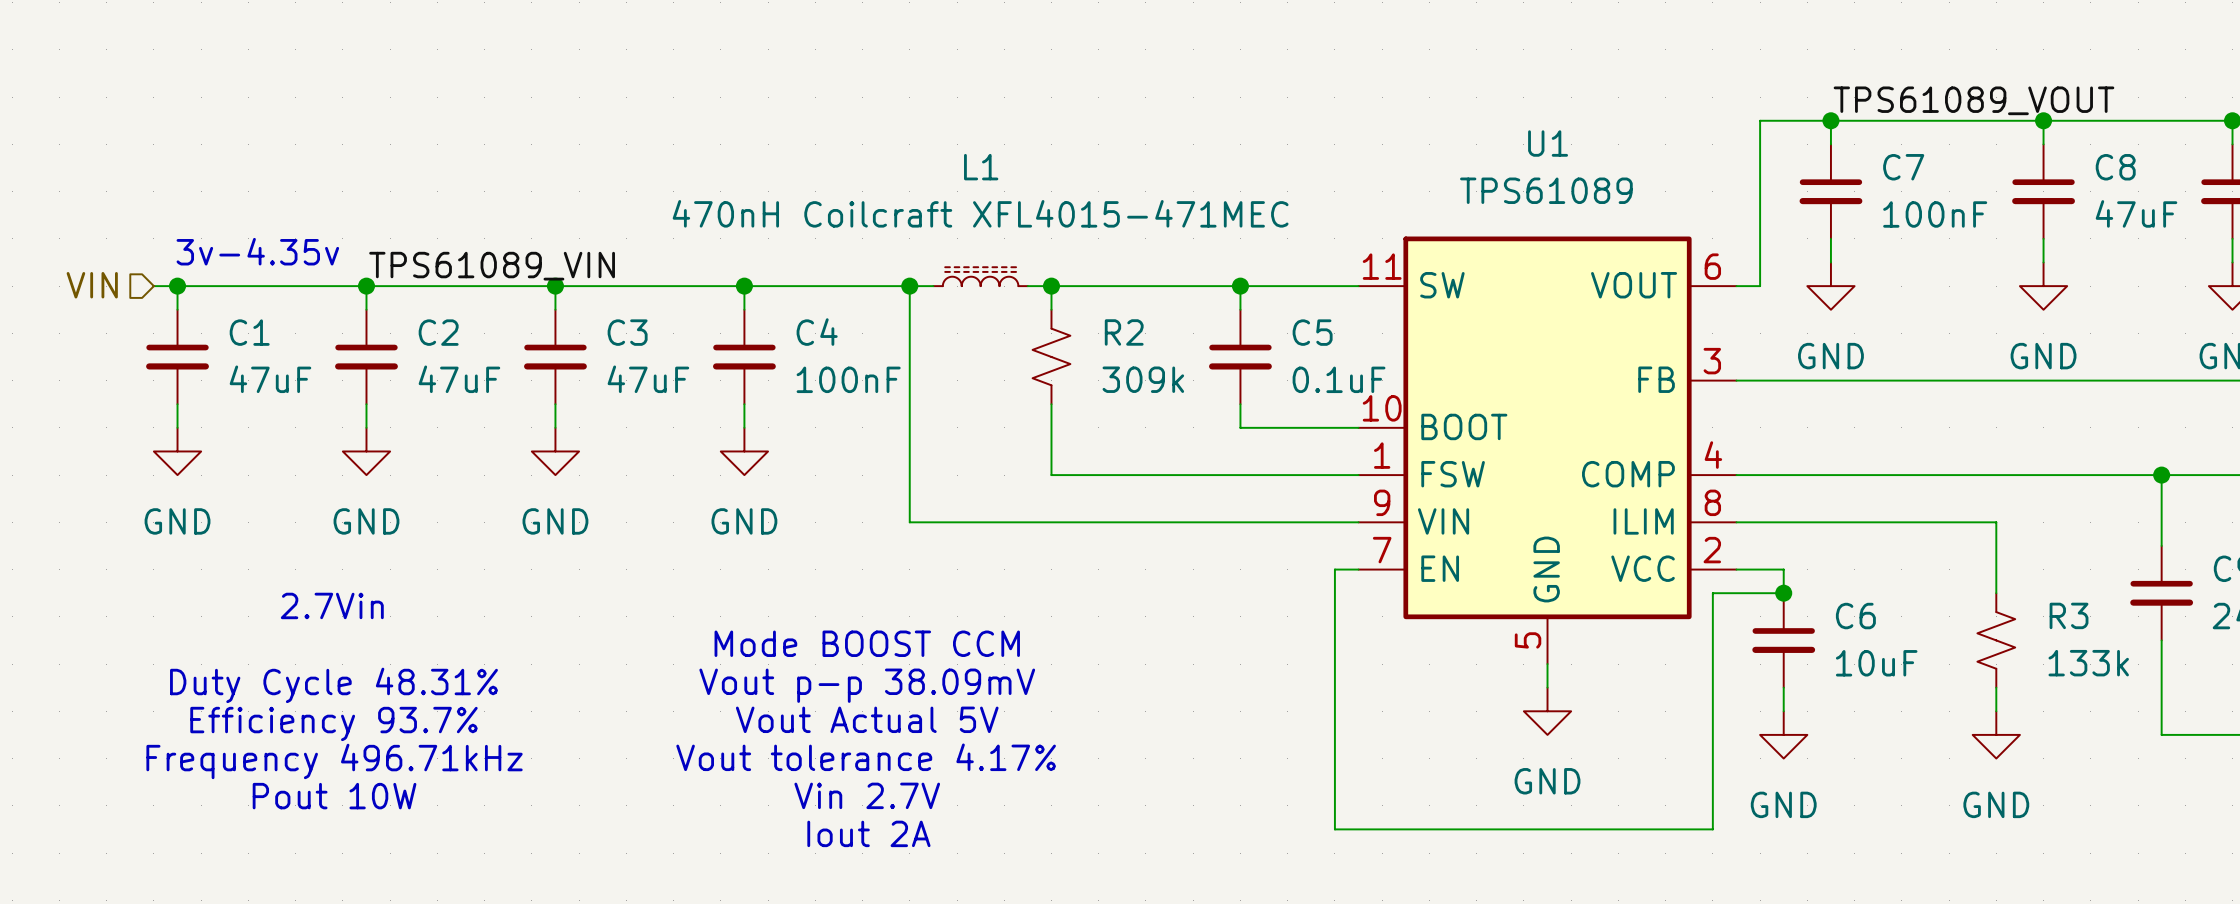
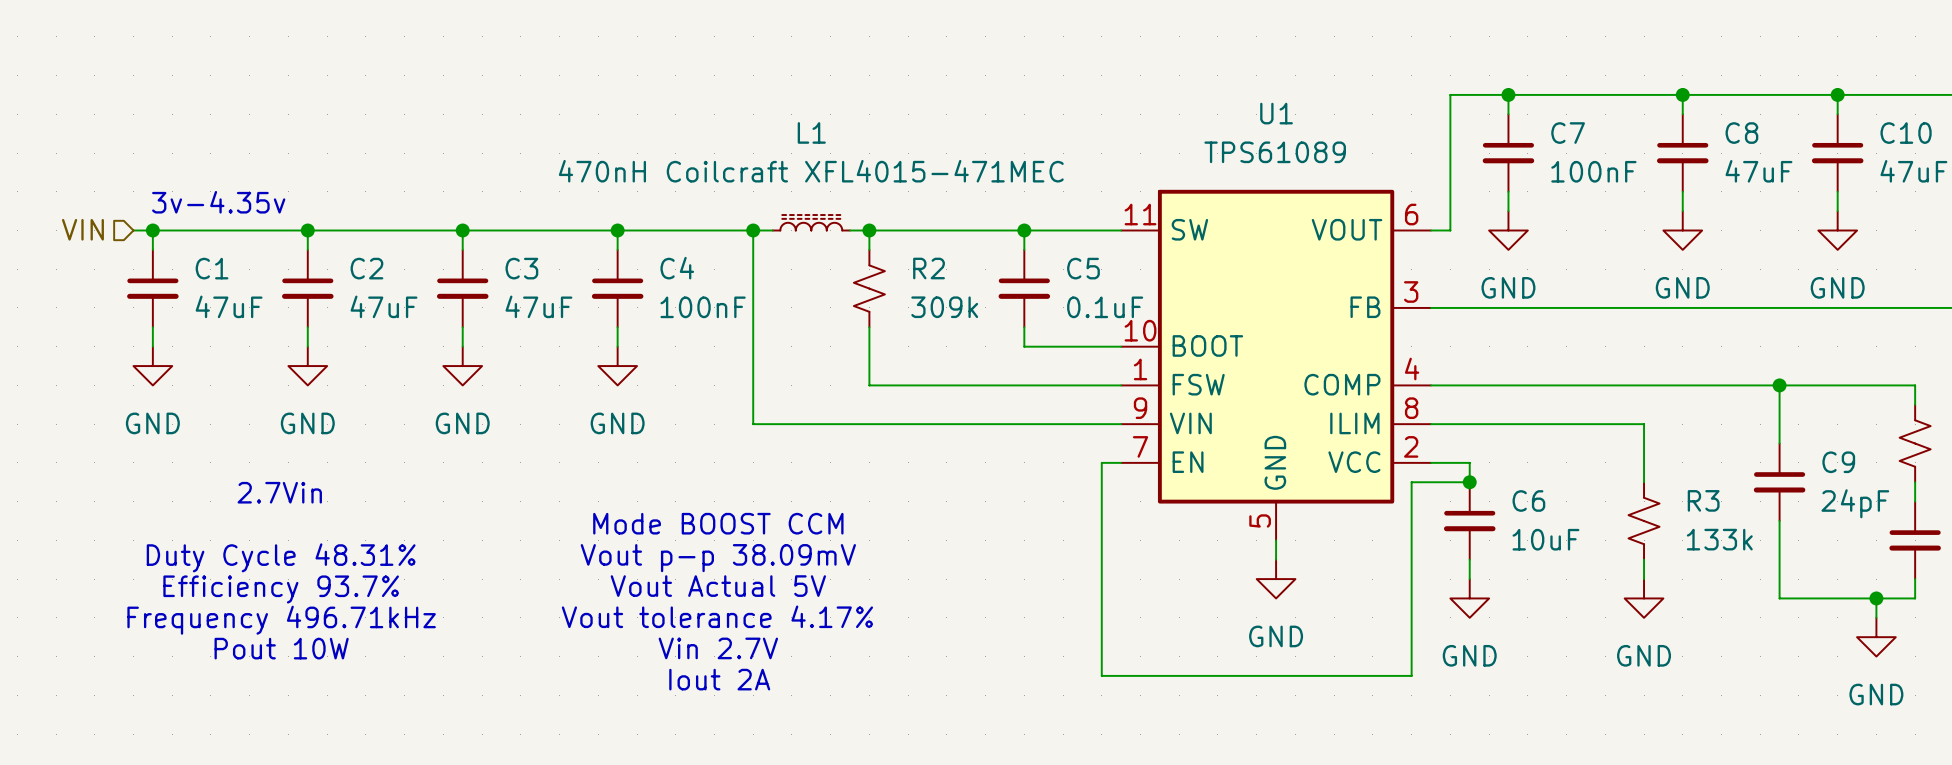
label: TPS61089_VOUT (1973, 100) -> none
label: TPS61089_VIN (492, 266) -> none

